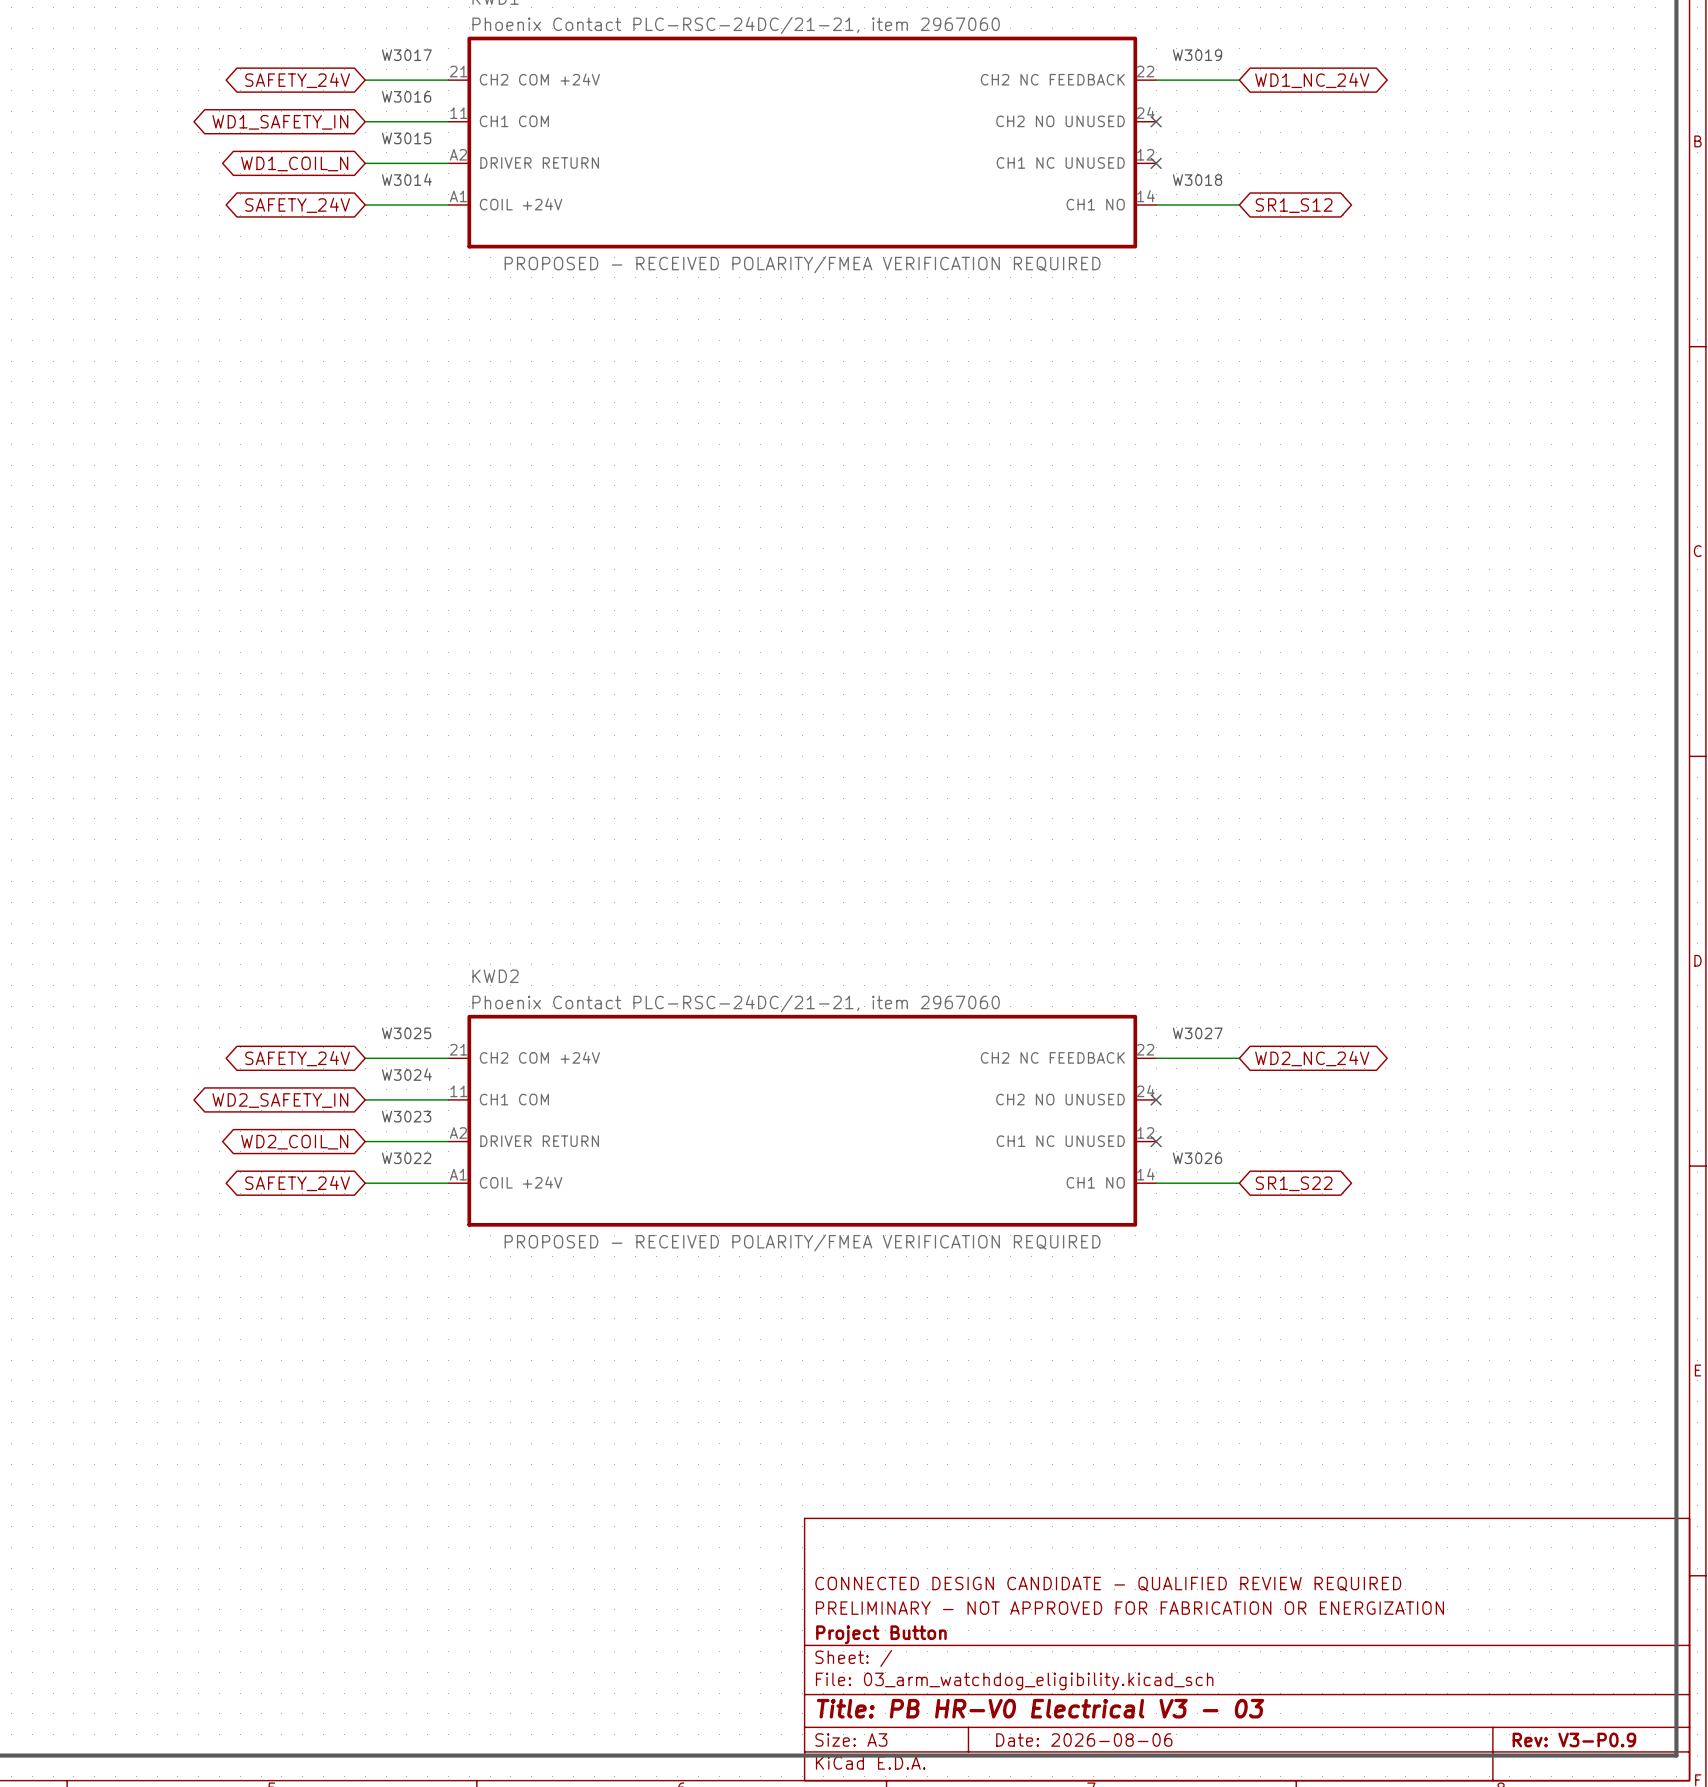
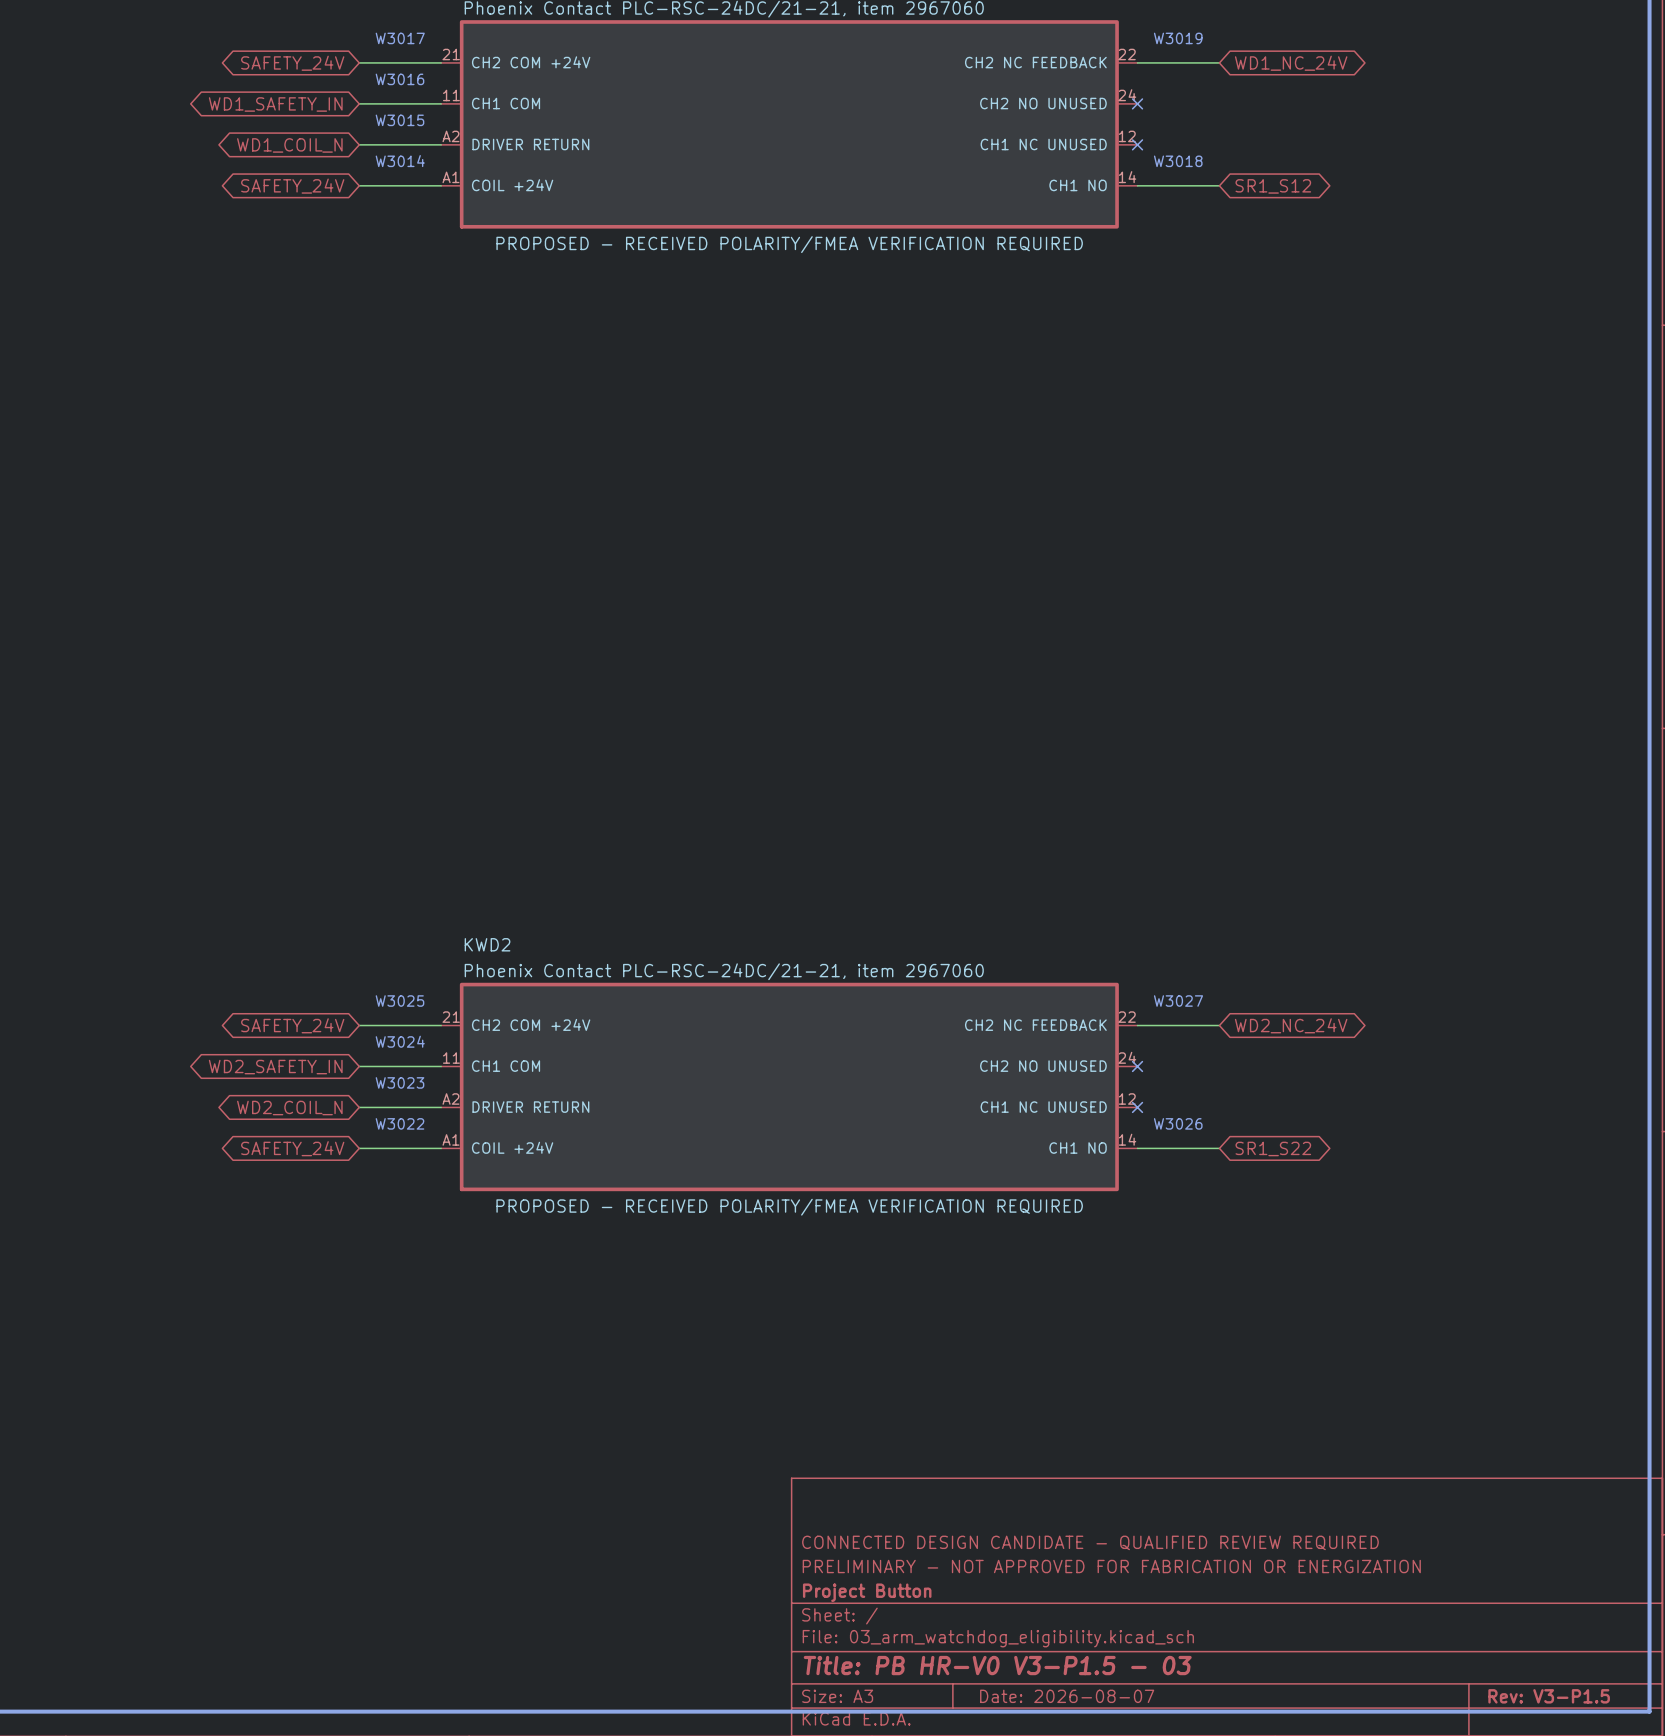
title block: Title: PB HR-V0 Electrical V3 - 03 (1040, 1708) -> Title: PB HR-V0 V3-P1.5 - 03 (997, 1665)
title block: Date: 2026-08-06 (1084, 1740) -> Date: 2026-08-07 (1067, 1696)
title block: Rev: V3-P0.9 (1574, 1740) -> Rev: V3-P1.5 (1549, 1696)

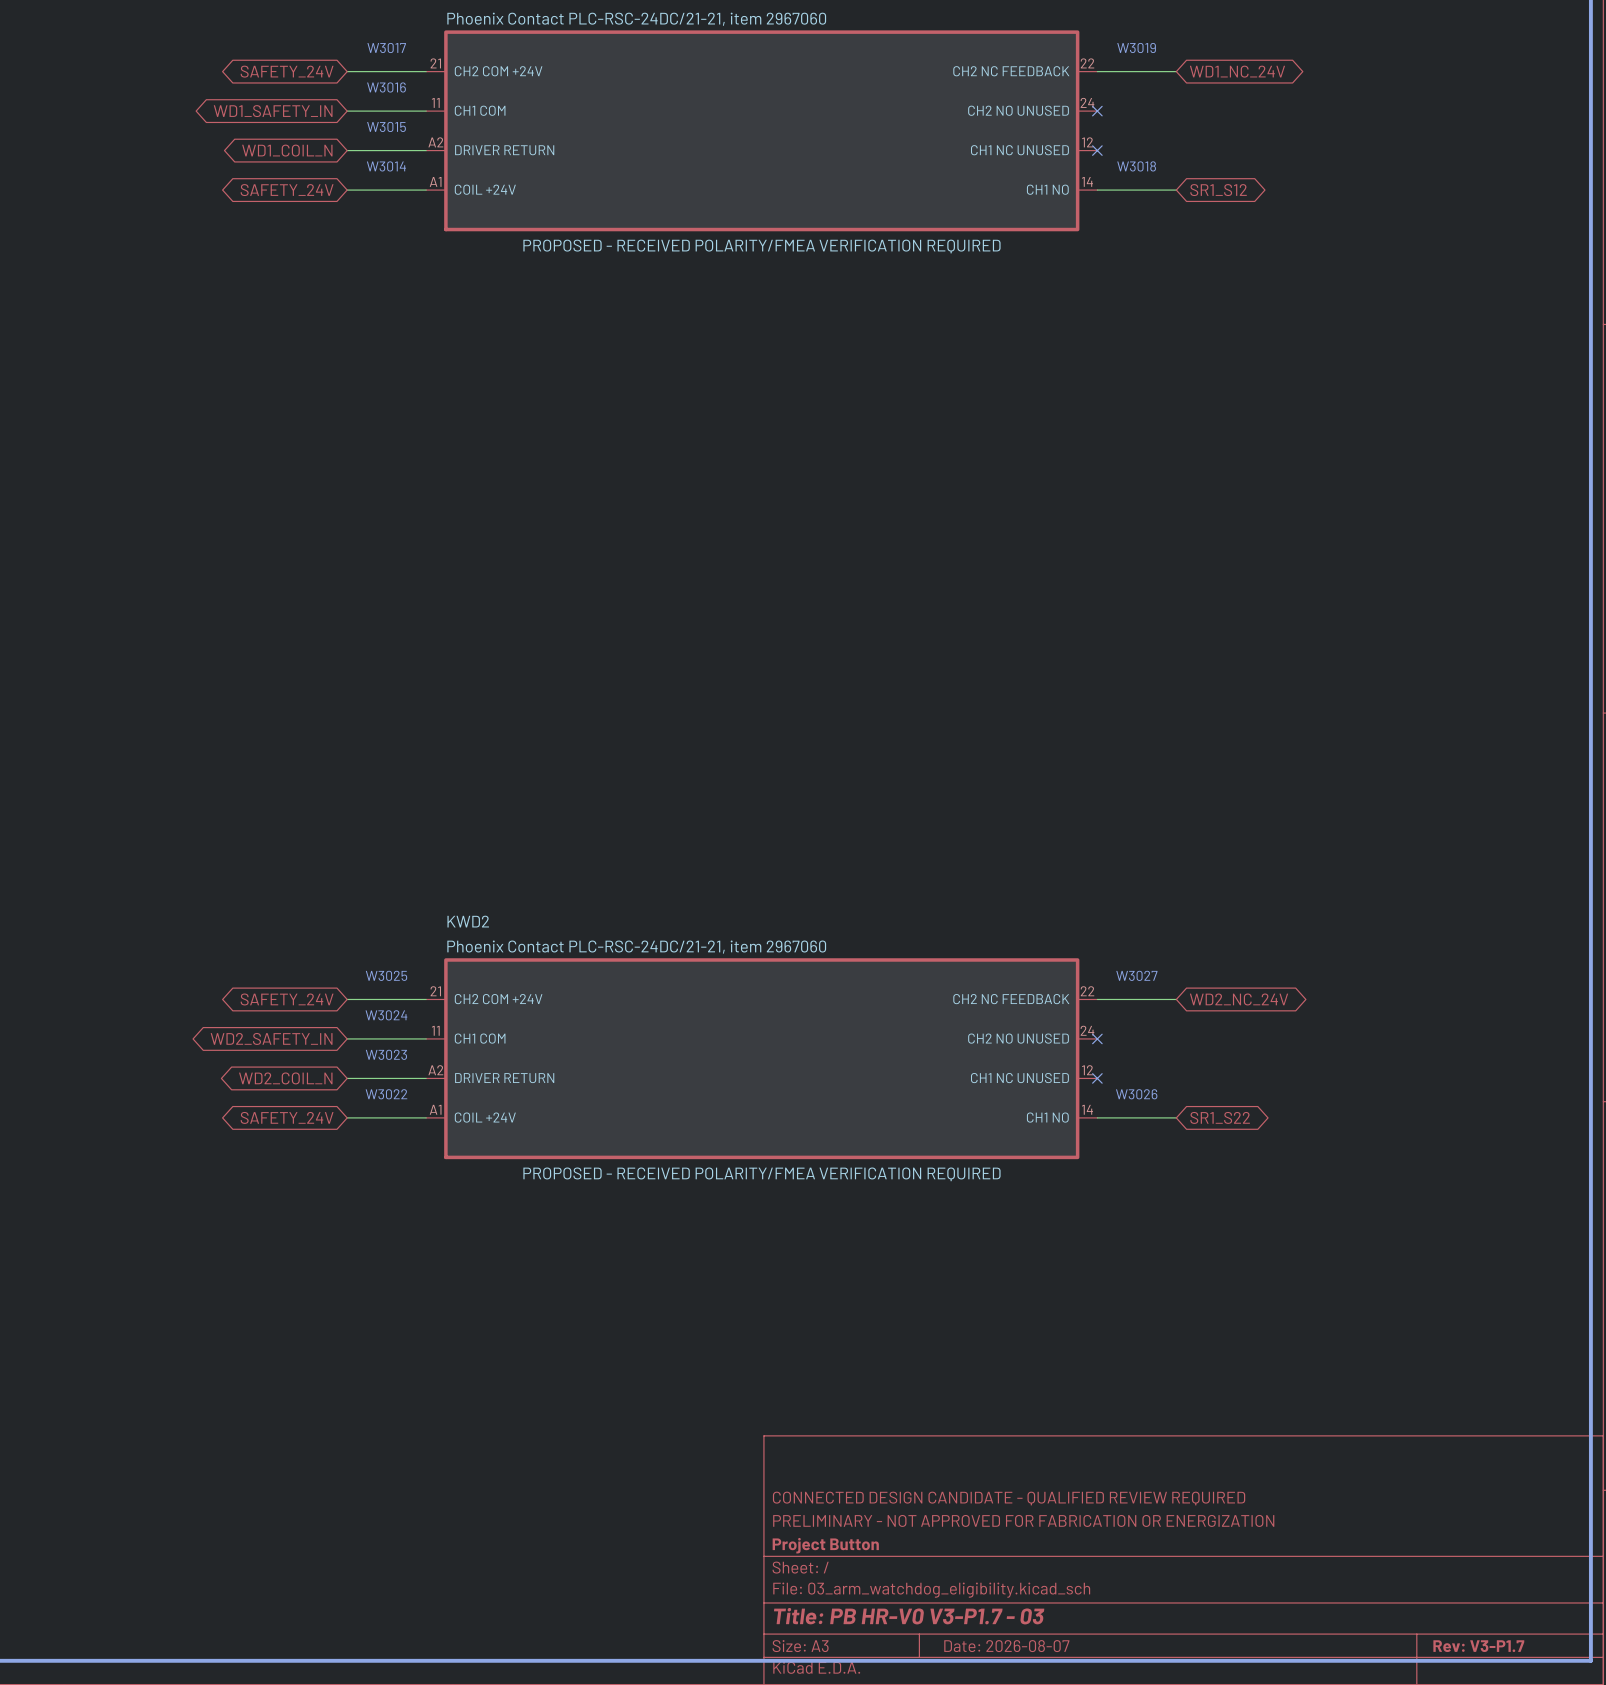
title block: Title: PB HR-V0 V3-P1.5 - 03 (997, 1665) -> Title: PB HR-V0 V3-P1.7 - 03 (909, 1616)
title block: Rev: V3-P1.5 (1549, 1696) -> Rev: V3-P1.7 (1478, 1646)

